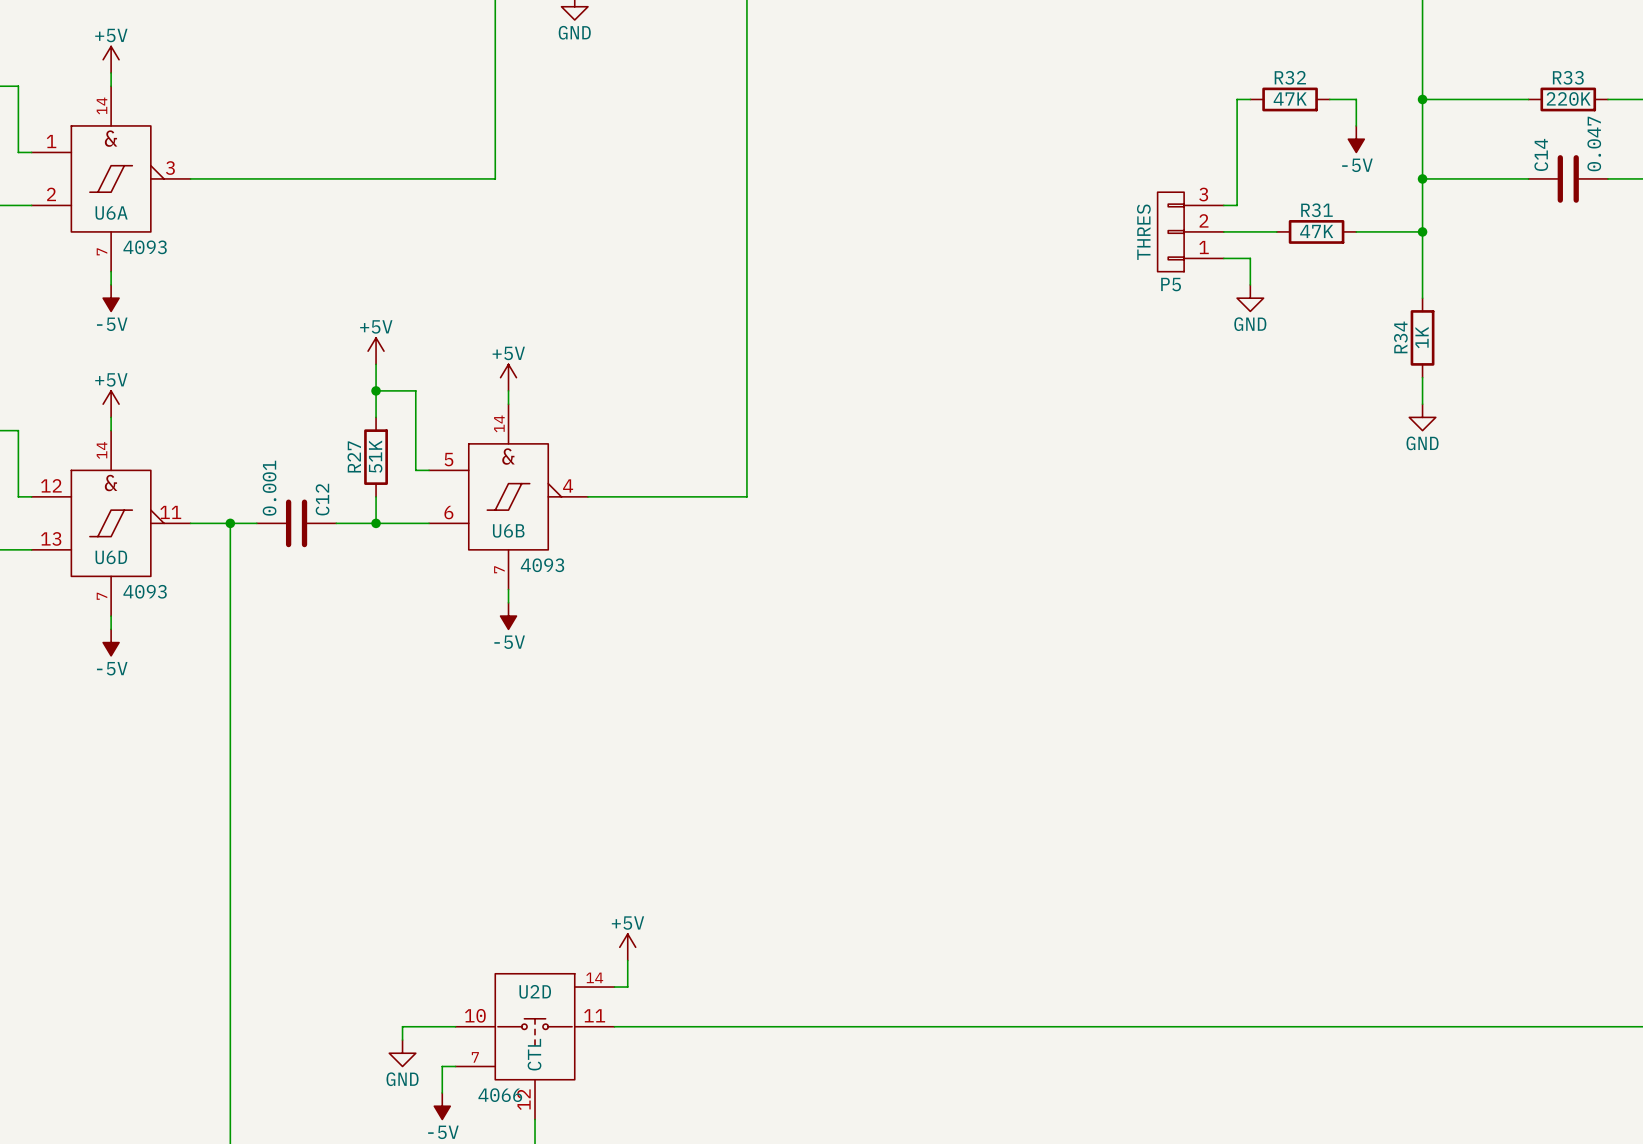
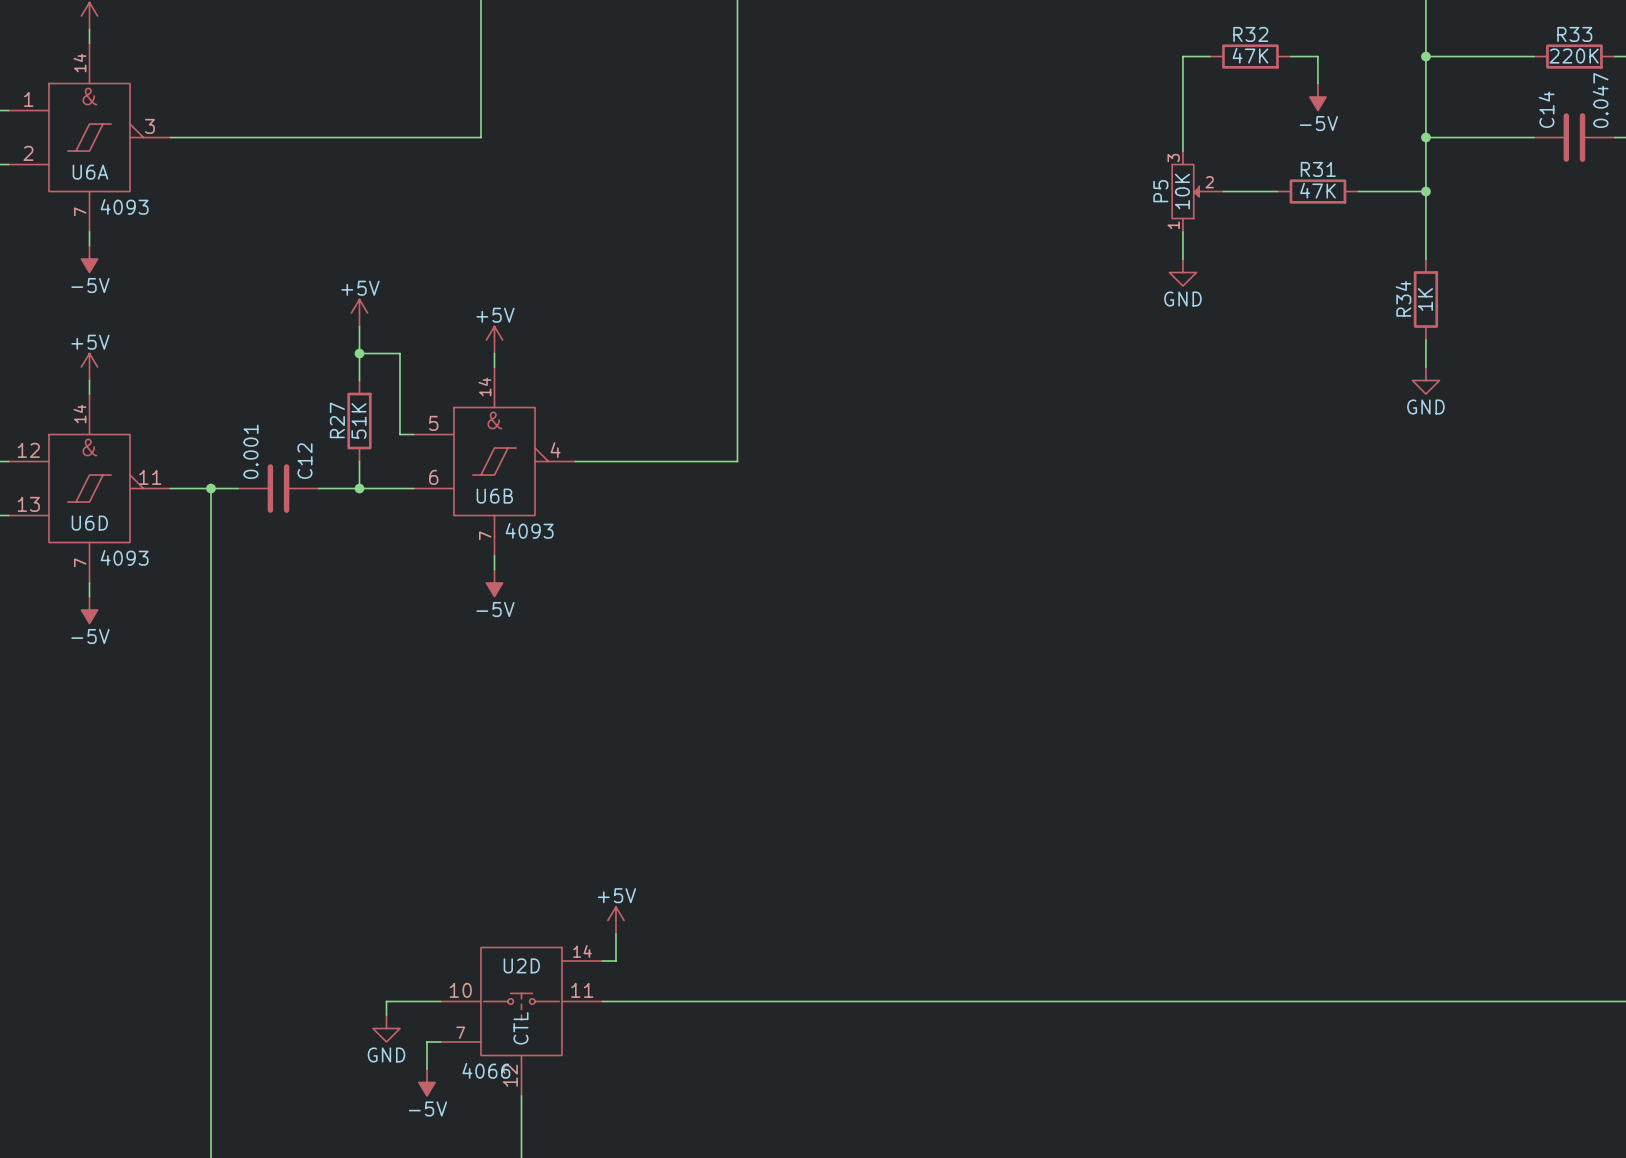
wire: none -> (1209, 56) (1182, 56) (1182, 151)
wire: (1250, 99) (1237, 99) (1237, 205) (1223, 205) -> none
R32 position: (1290, 99) -> (1250, 56)
wire: (1329, 99) (1356, 99) (1356, 125) -> (1290, 56) (1317, 56) (1317, 83)
power symbol position: -5V (1356, 139) -> -5V (1317, 97)
P5 symbol: [1157, 192, 1224, 272] -> [1172, 151, 1224, 233]
P5 value: THRES (1143, 232) -> 10K (1182, 191)
wire: (1223, 258) (1250, 258) (1250, 284) -> none
wire: none -> (1182, 232) (1182, 259)
P5 name position: P5 (1171, 284) -> P5 (1160, 191)
power symbol position: GND (1250, 298) -> GND (1182, 272)

